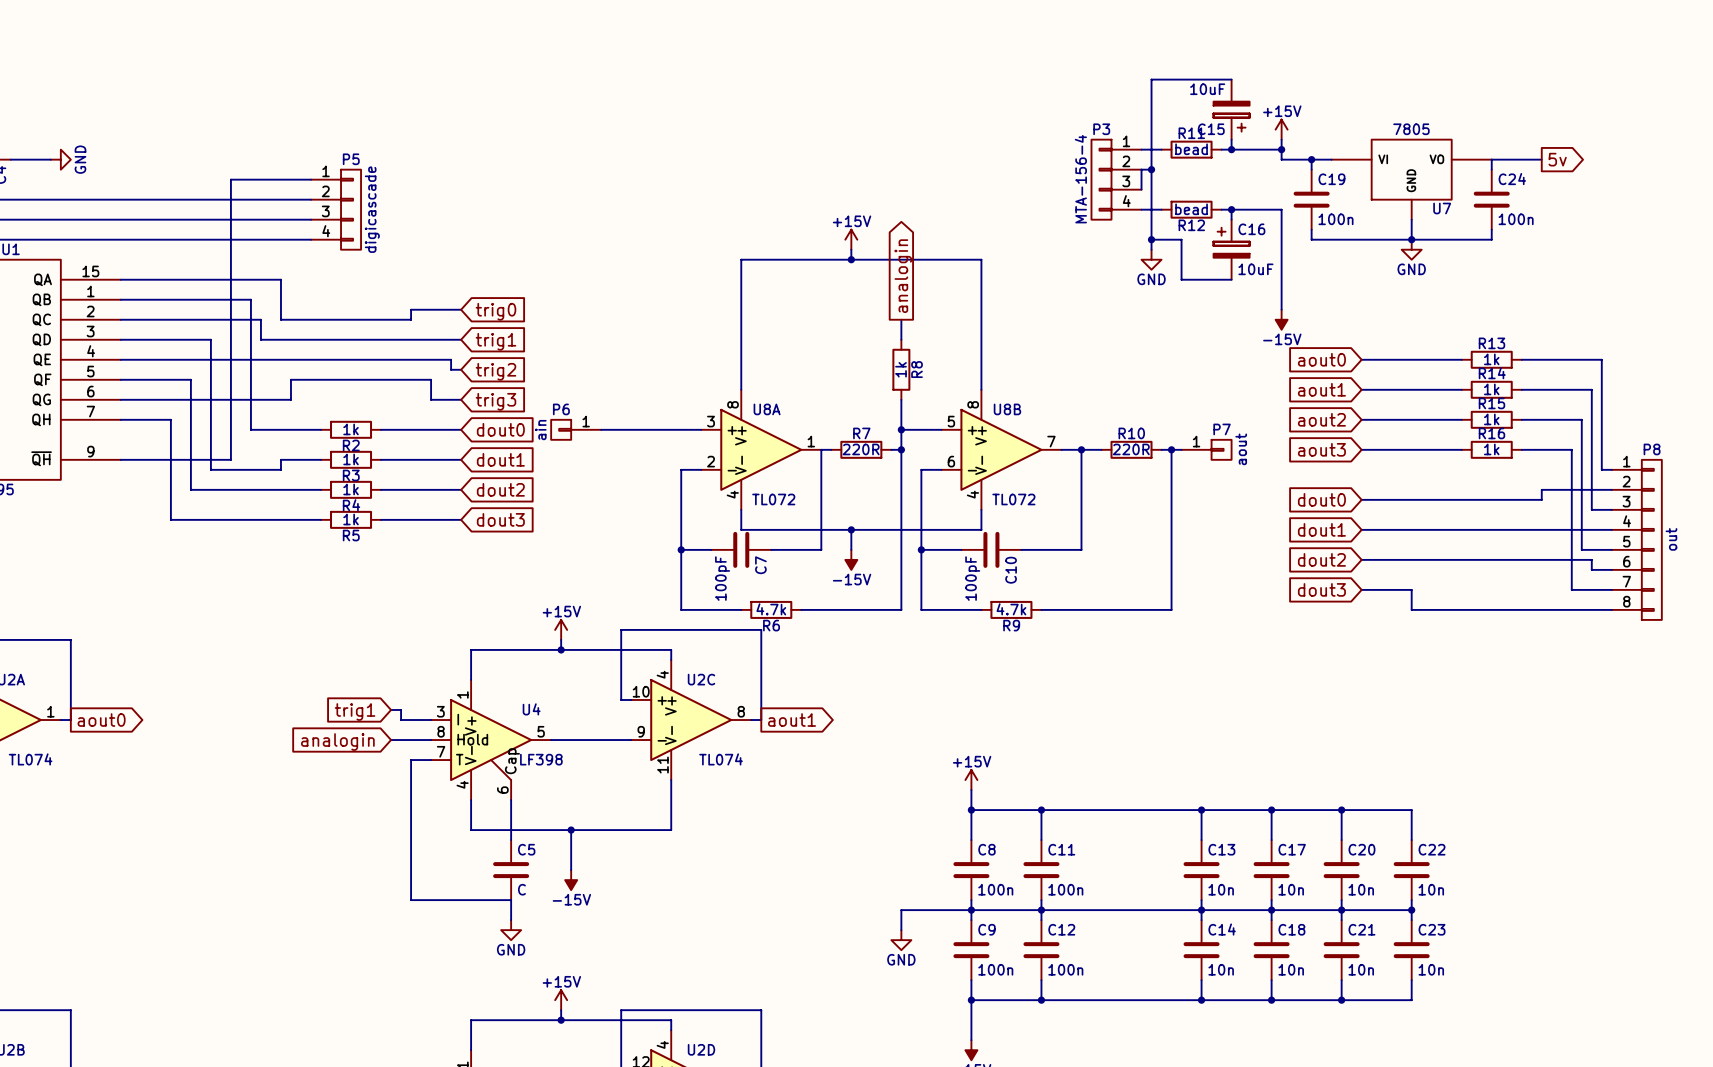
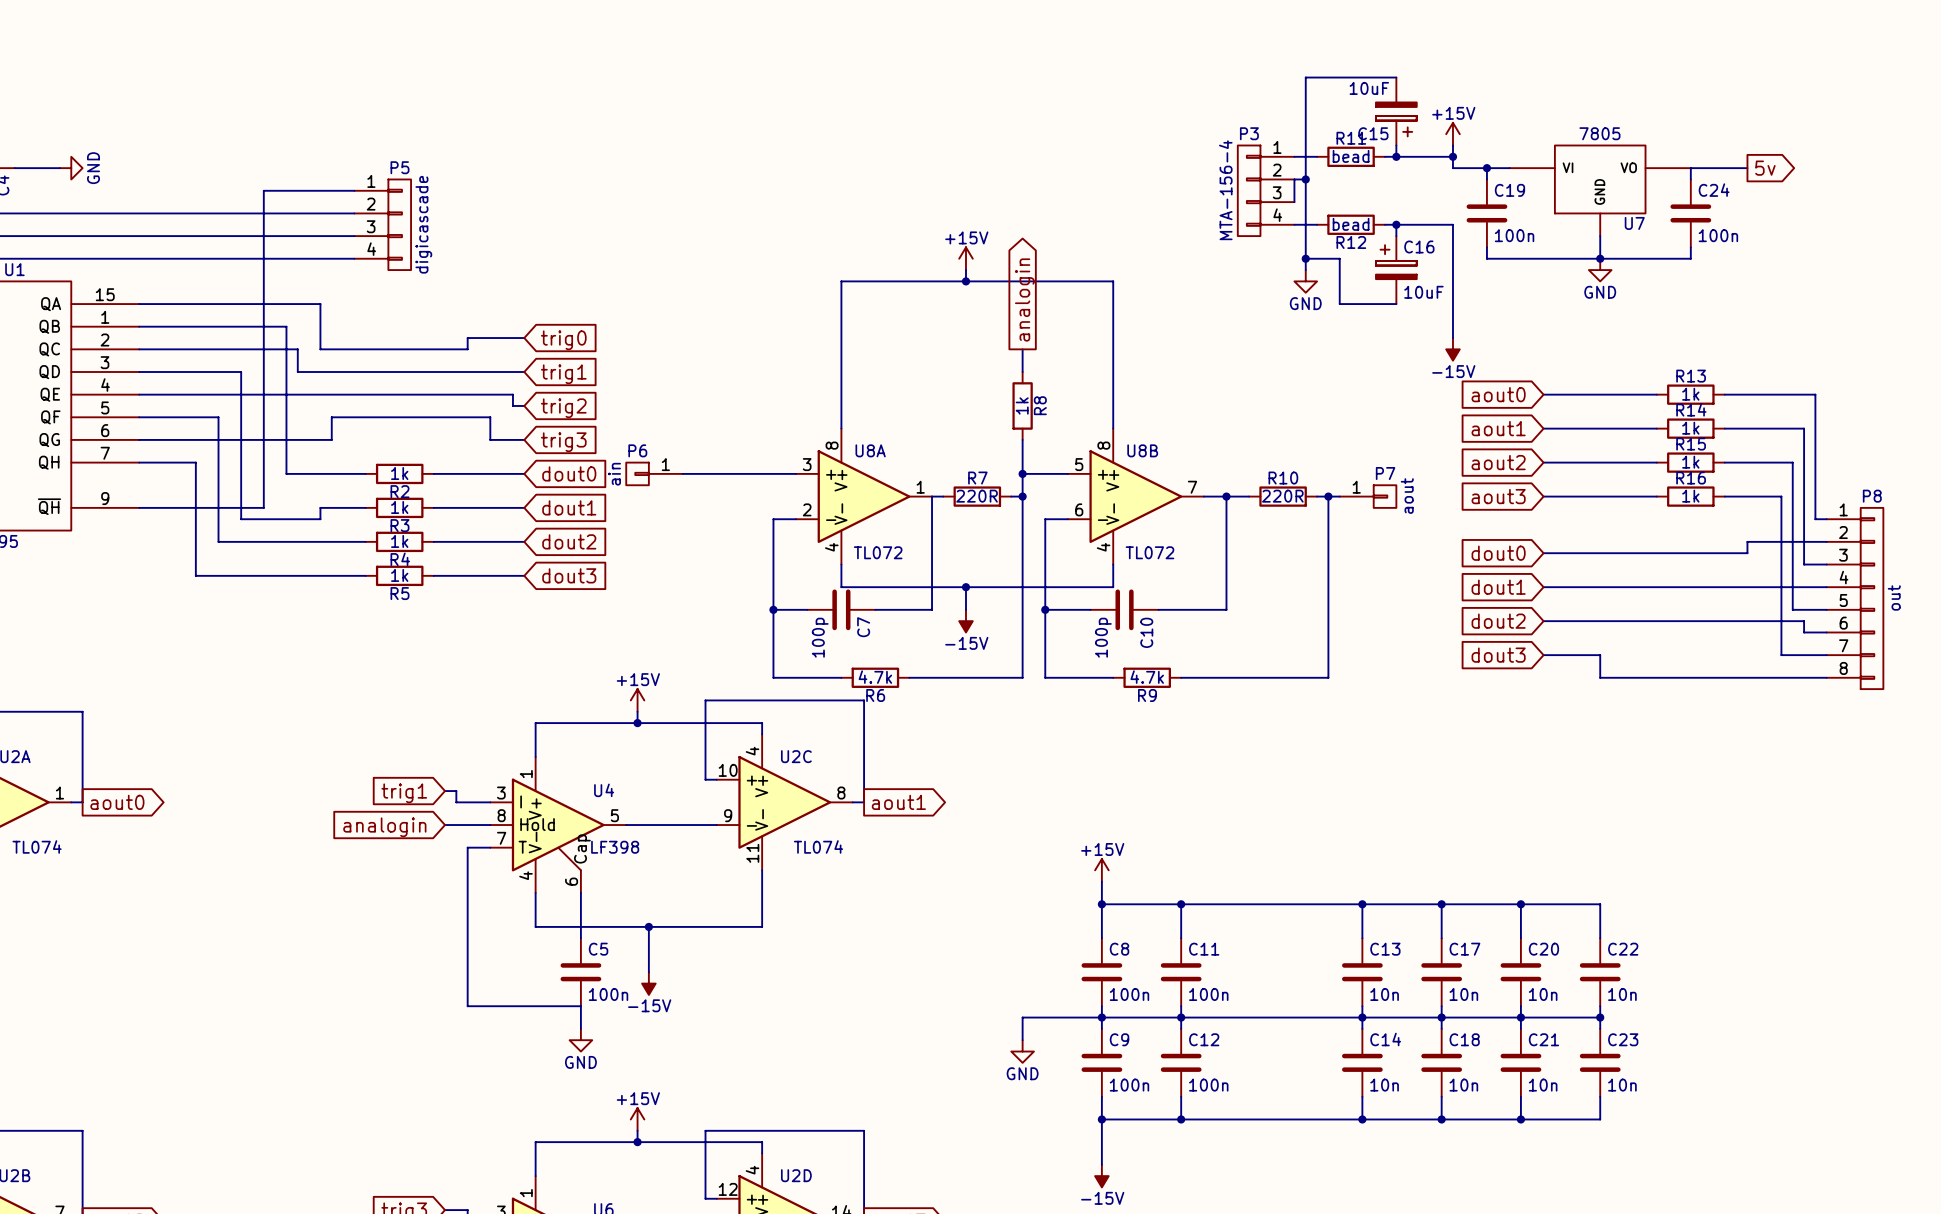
C7 value: 100pF (722, 578) -> 100p (820, 637)
C10 value: 100pF (972, 578) -> 100p (1103, 637)
C5 value: C (521, 889) -> 100n (608, 994)

